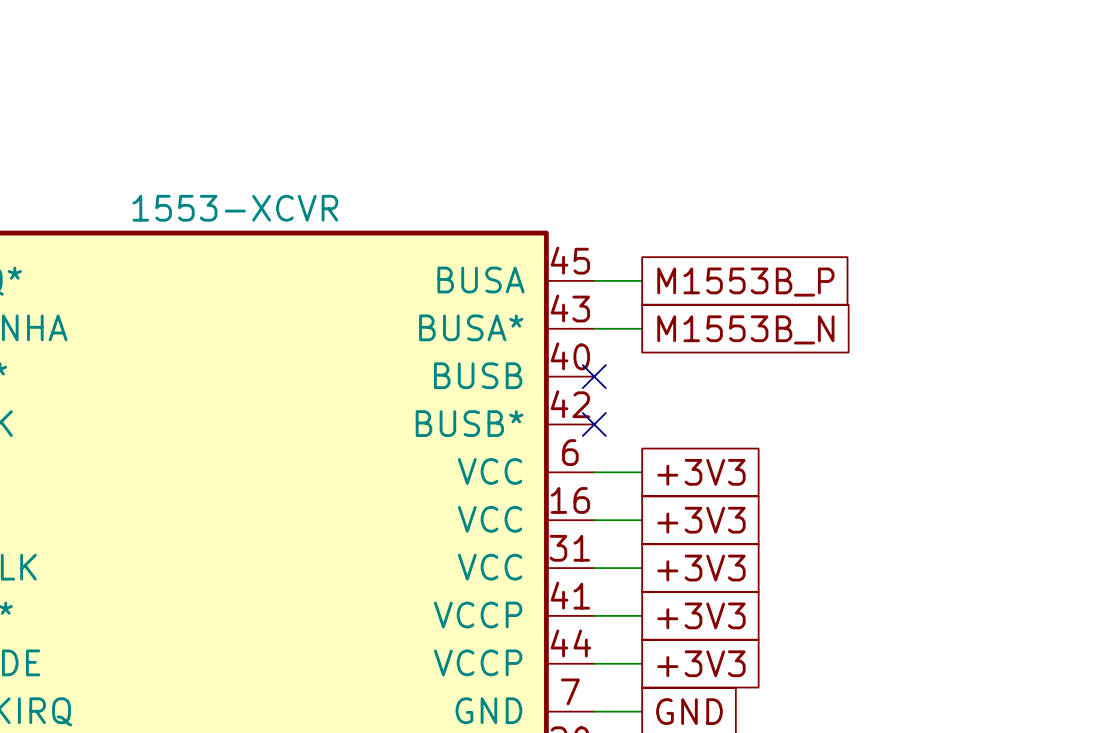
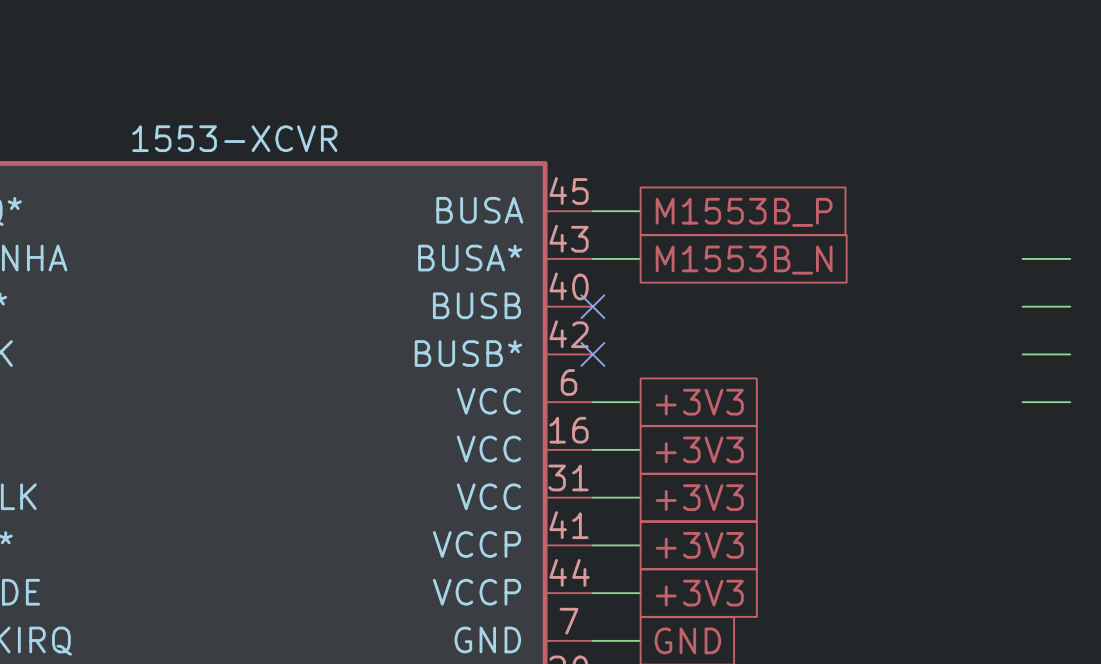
wire: none -> (1022, 258) (1070, 258)
wire: none -> (1022, 306) (1070, 306)
wire: none -> (1022, 354) (1070, 354)
wire: none -> (1022, 402) (1070, 402)

